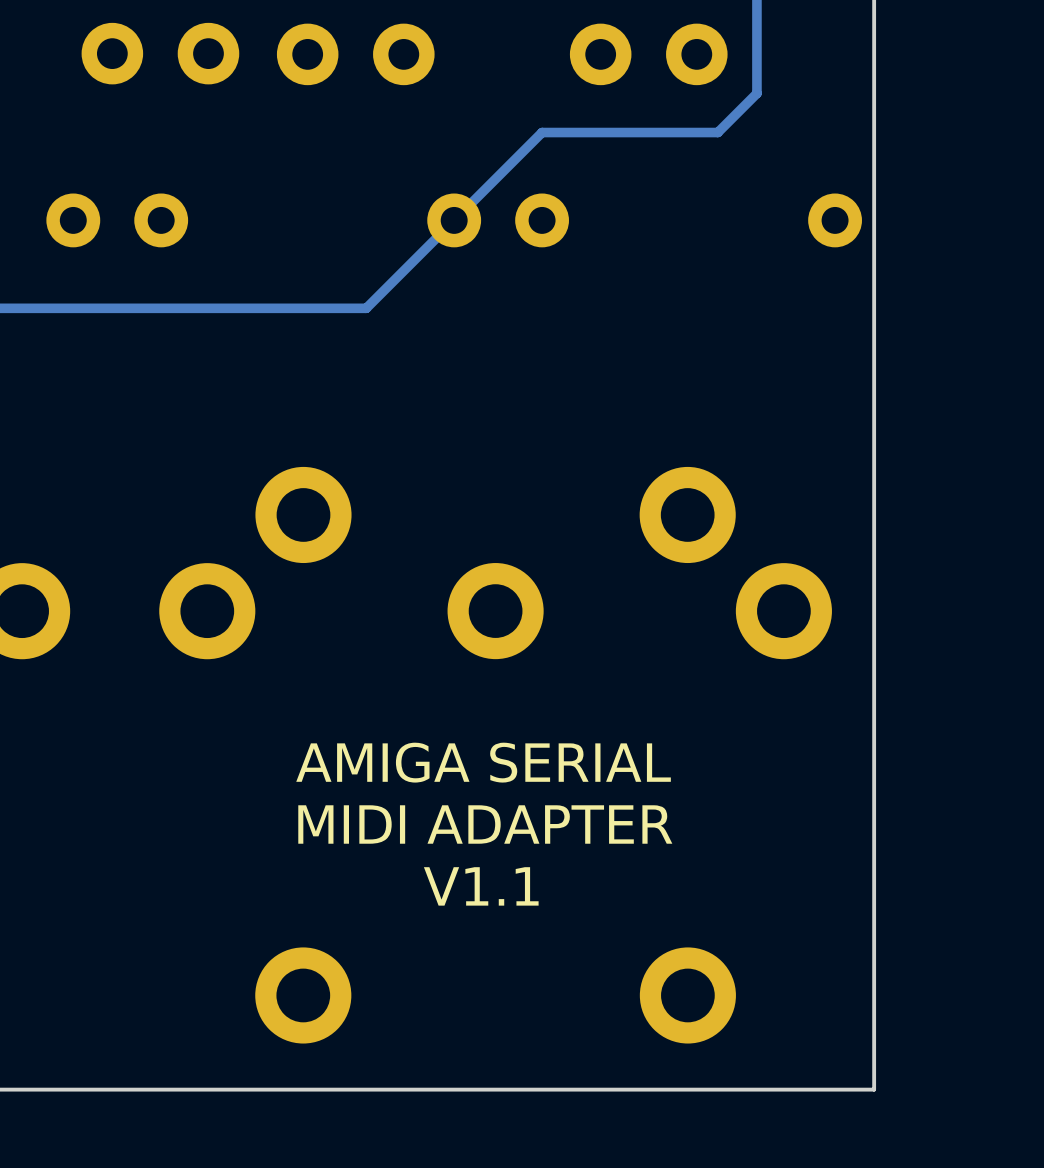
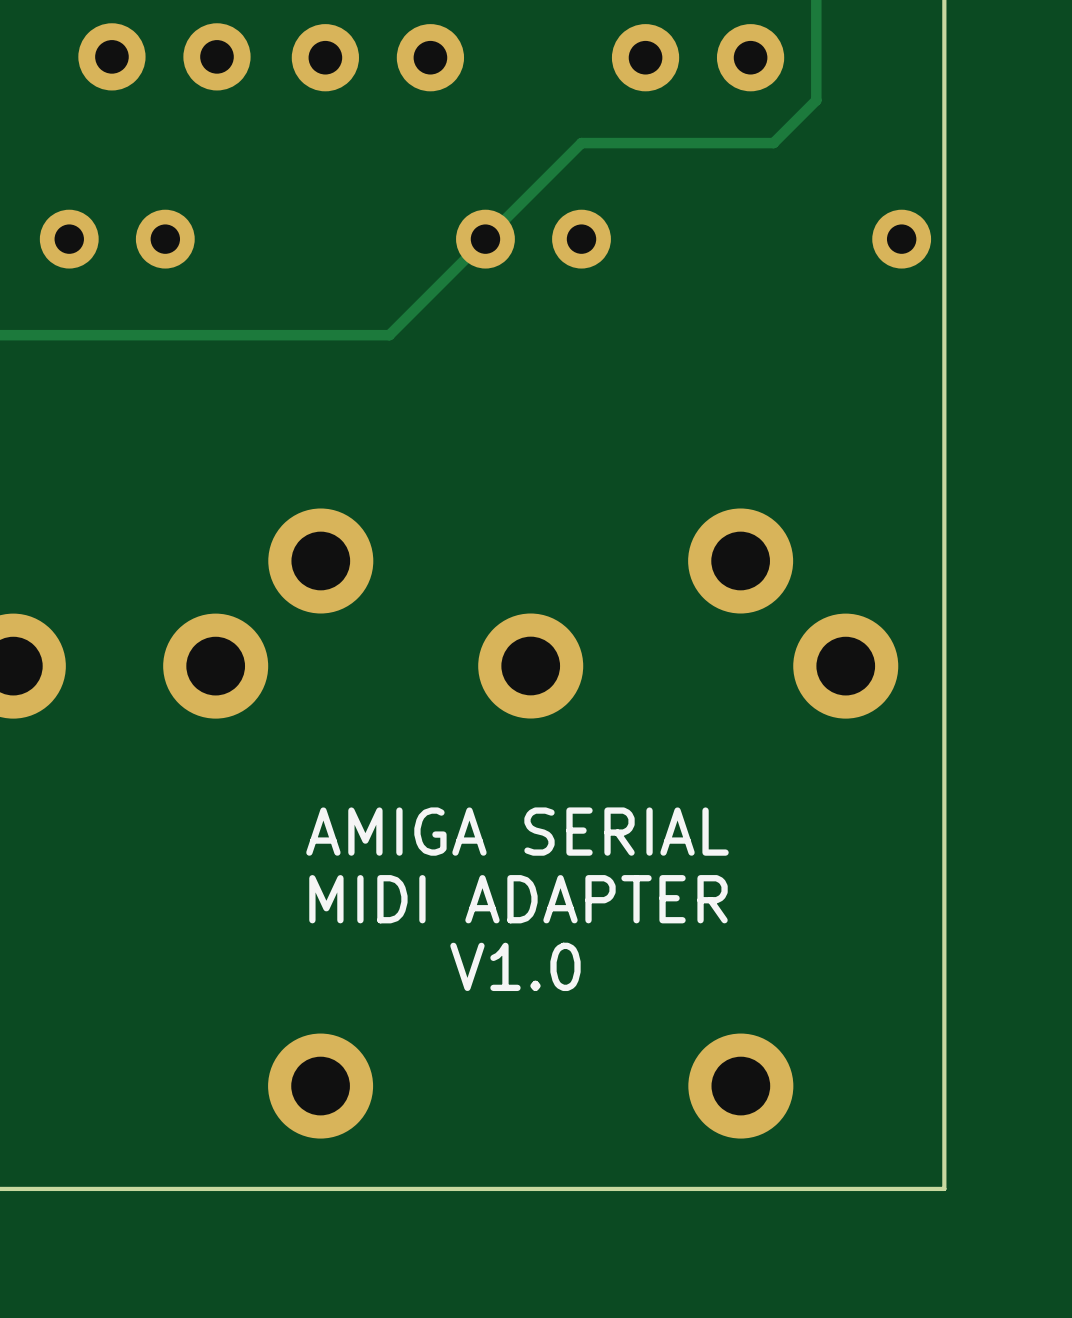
text: V1.1 (481, 886) -> V1.0 (515, 966)

